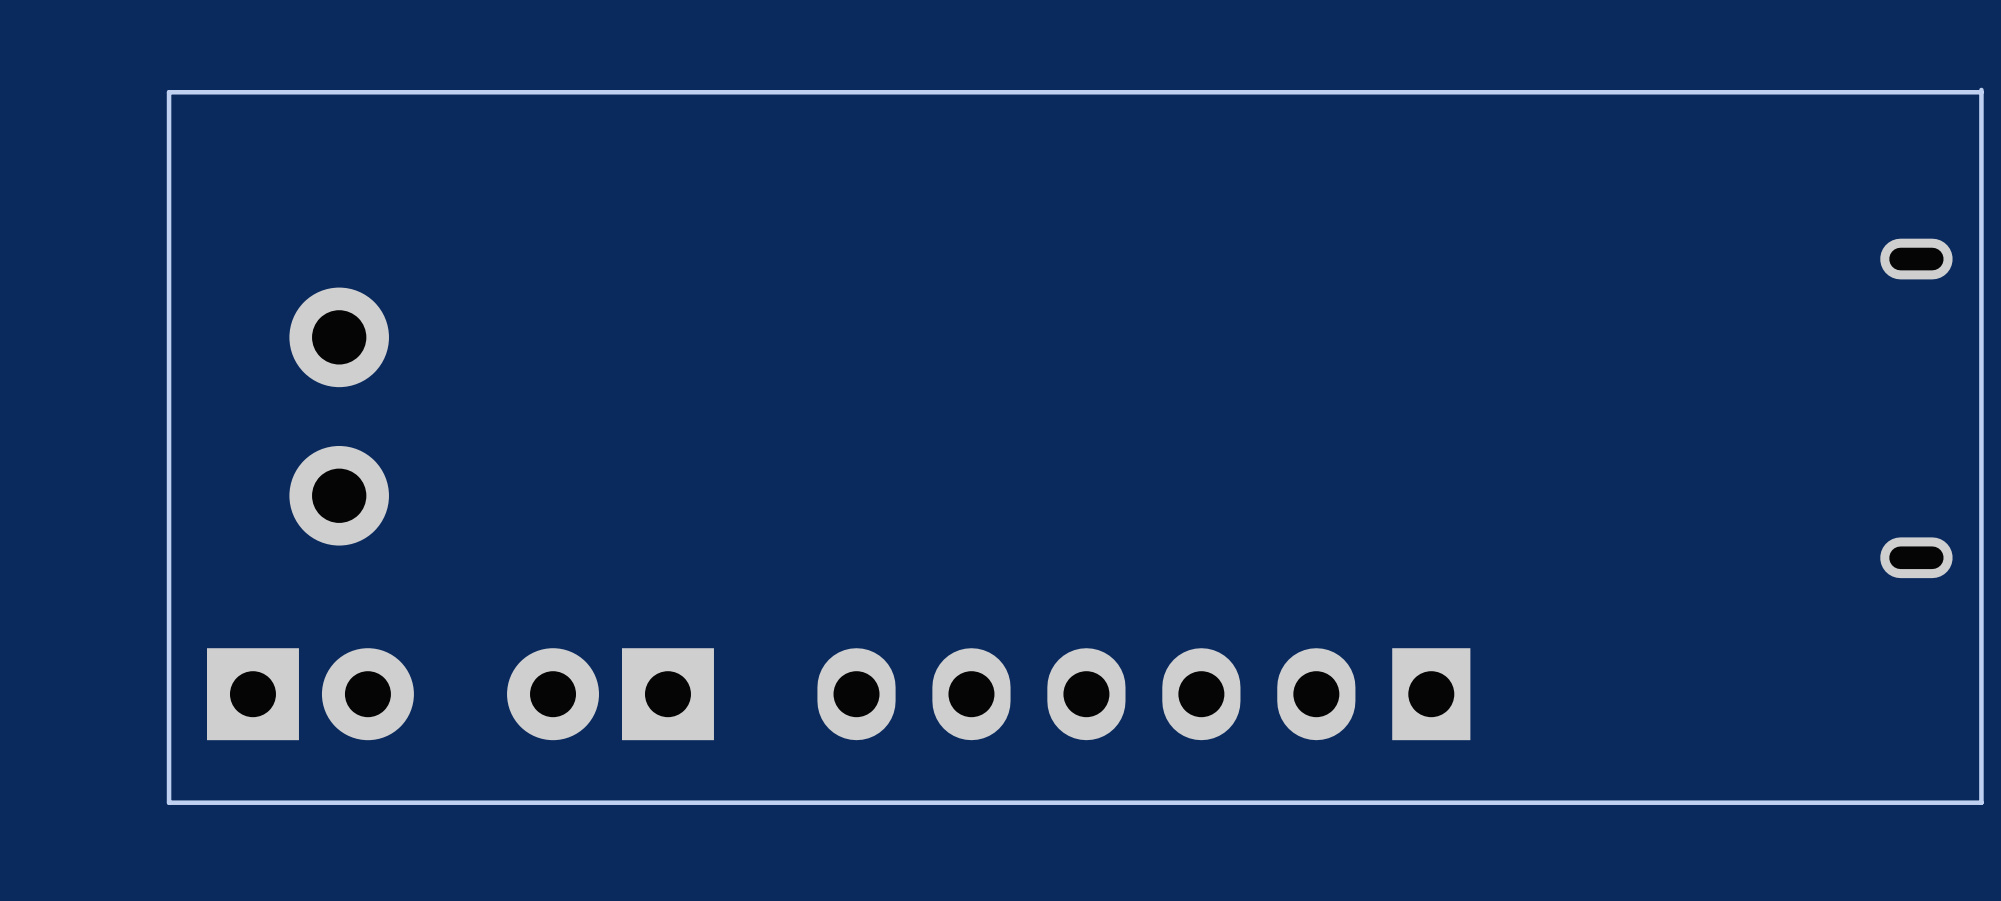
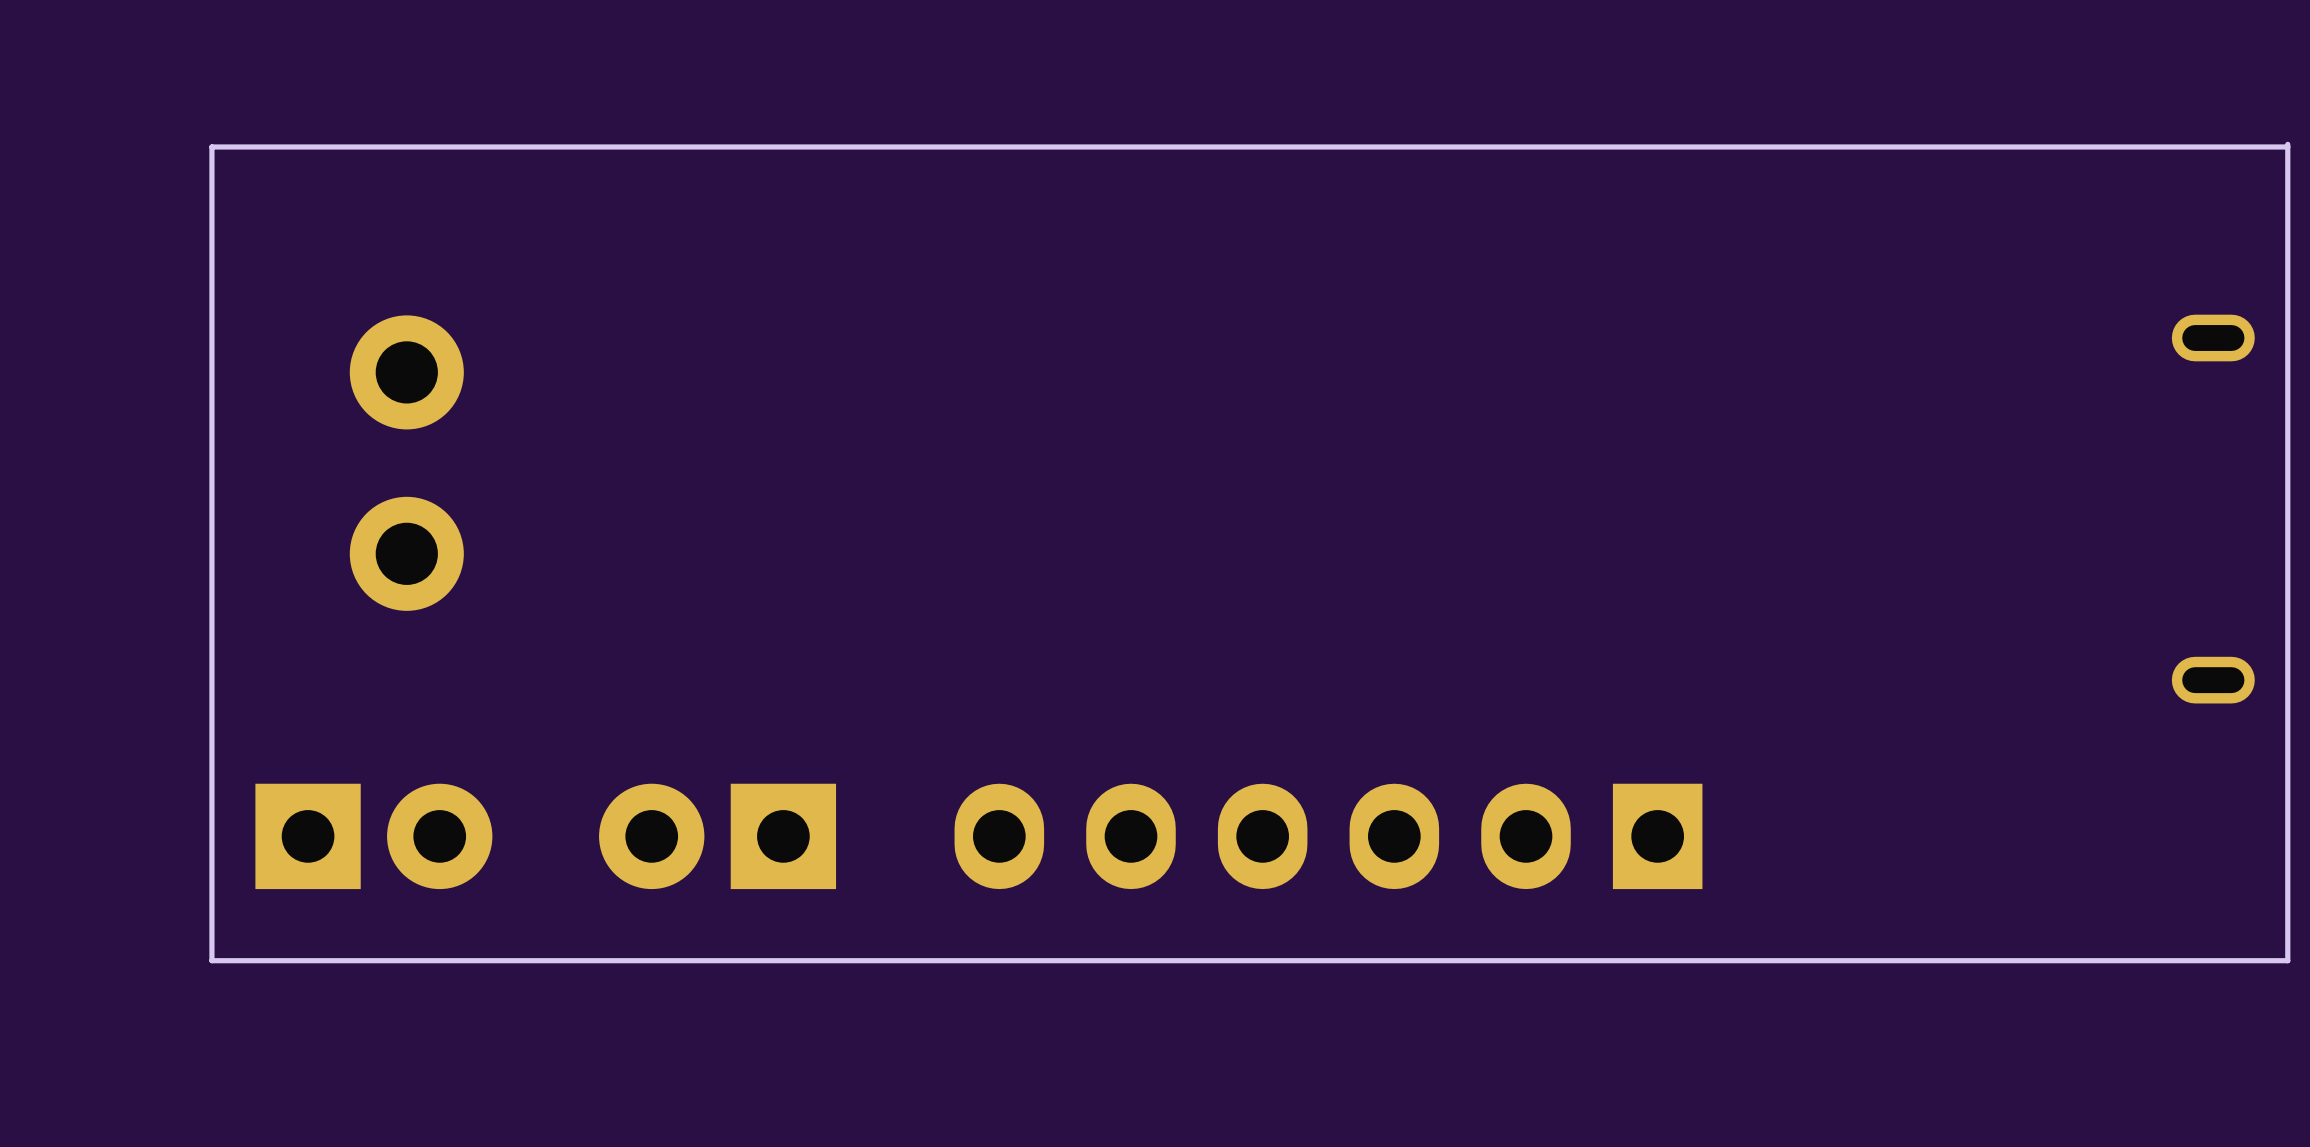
part position: (339, 416) -> (406, 463)

